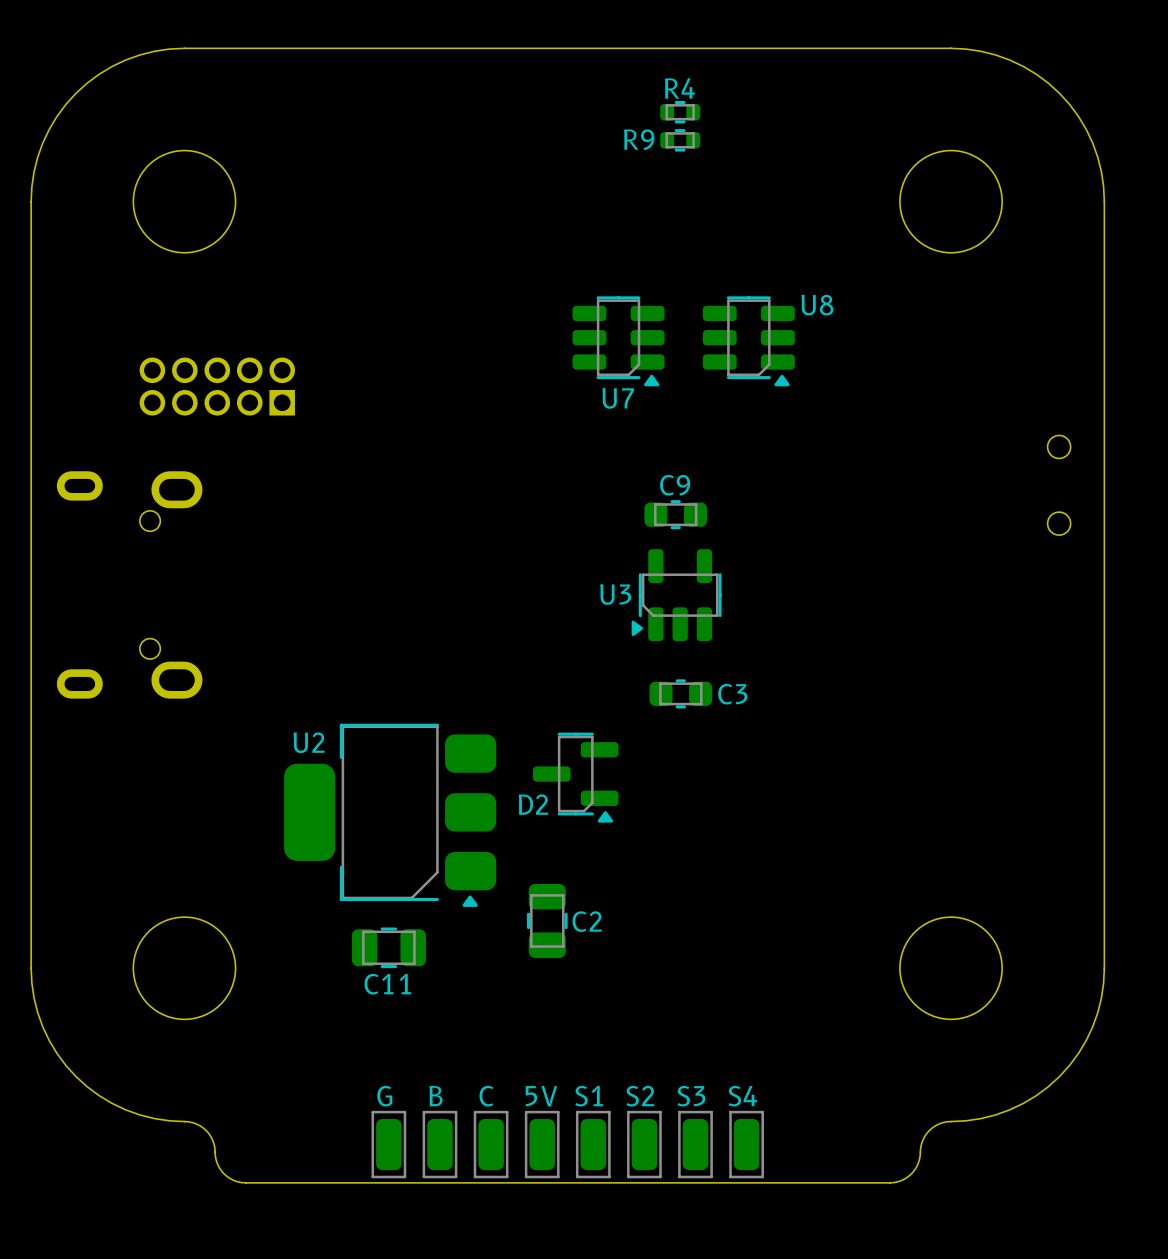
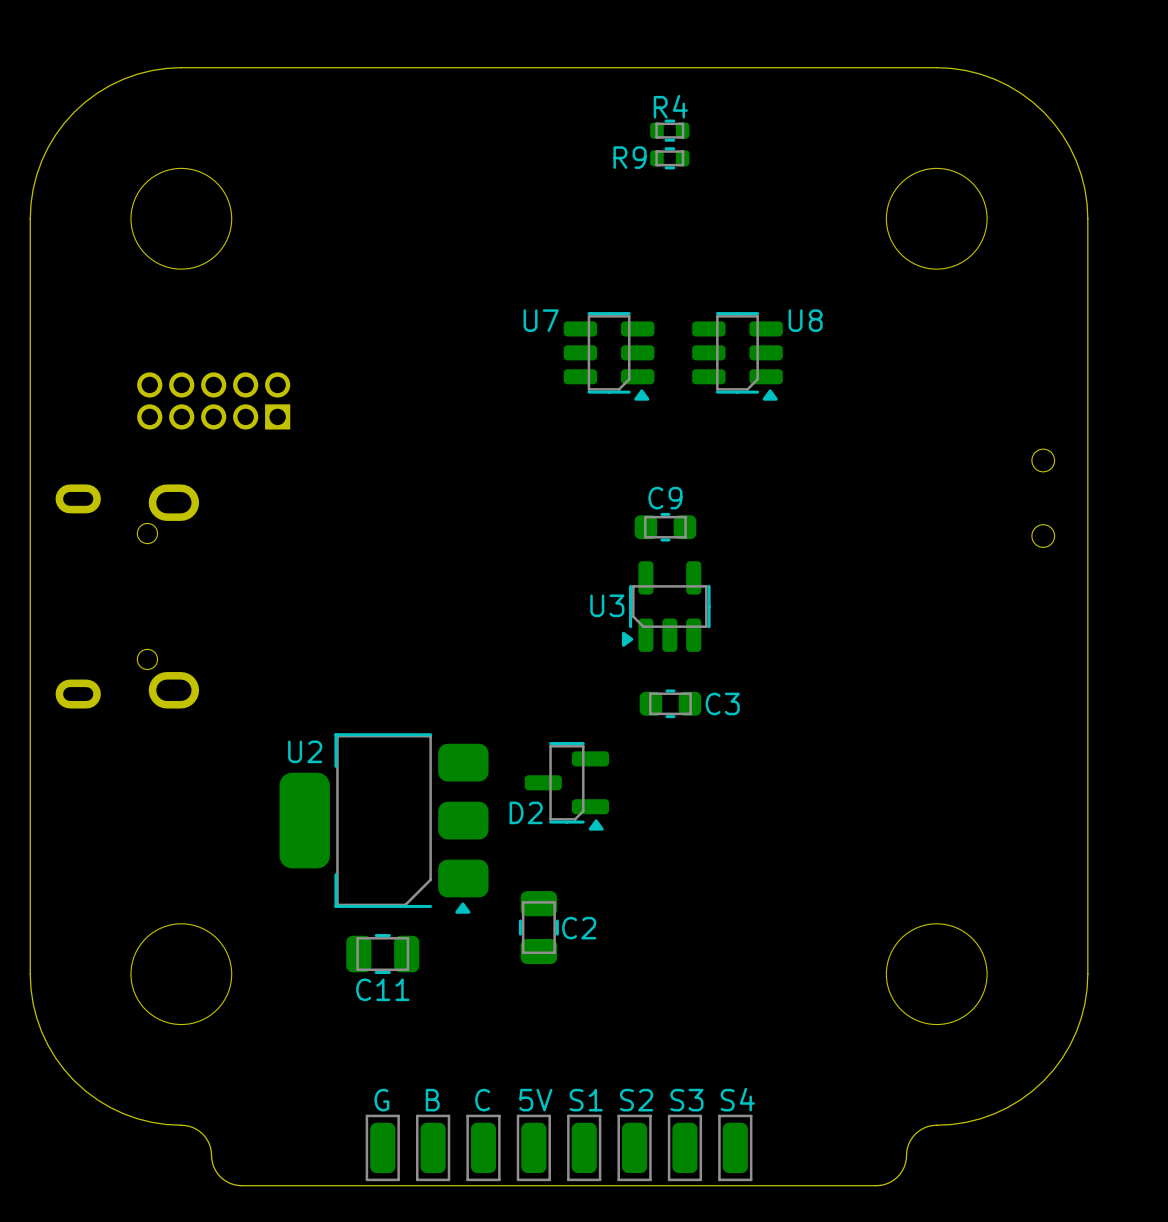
U7 name position: U7 (618, 398) -> U7 (541, 320)

